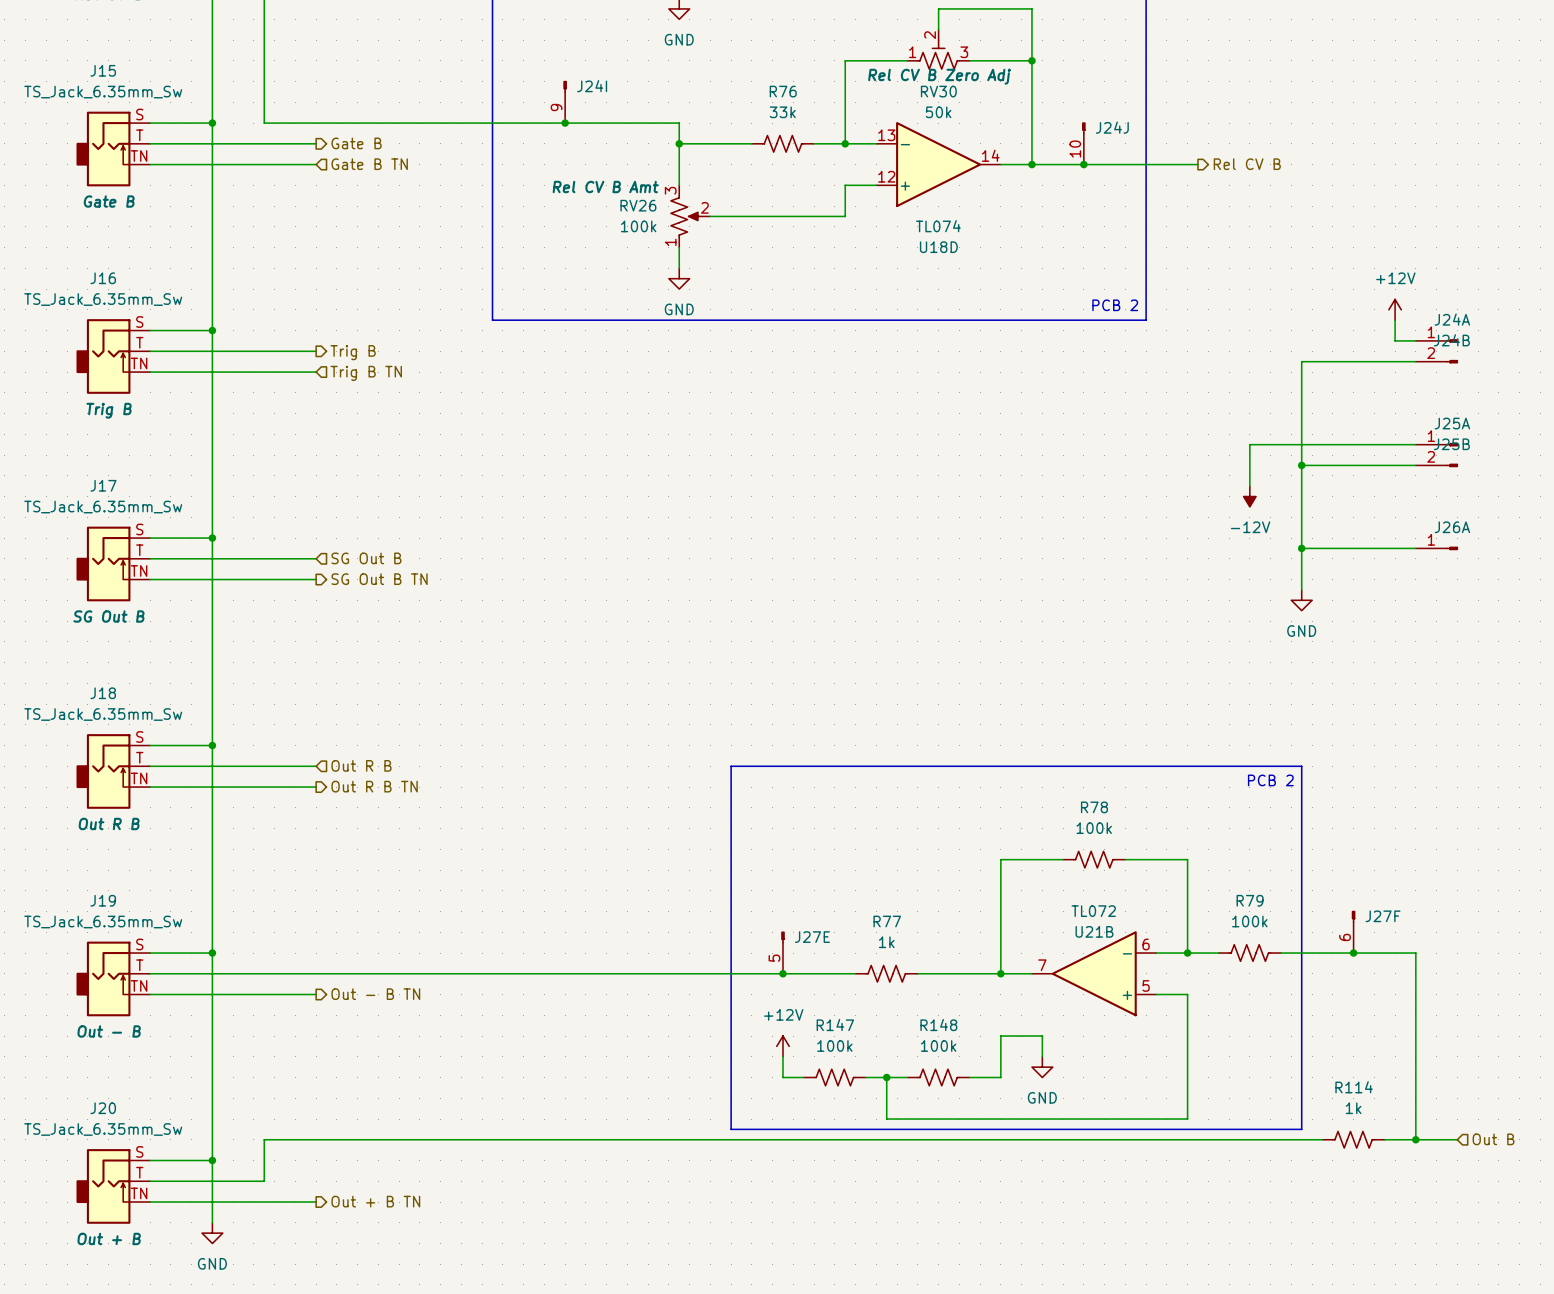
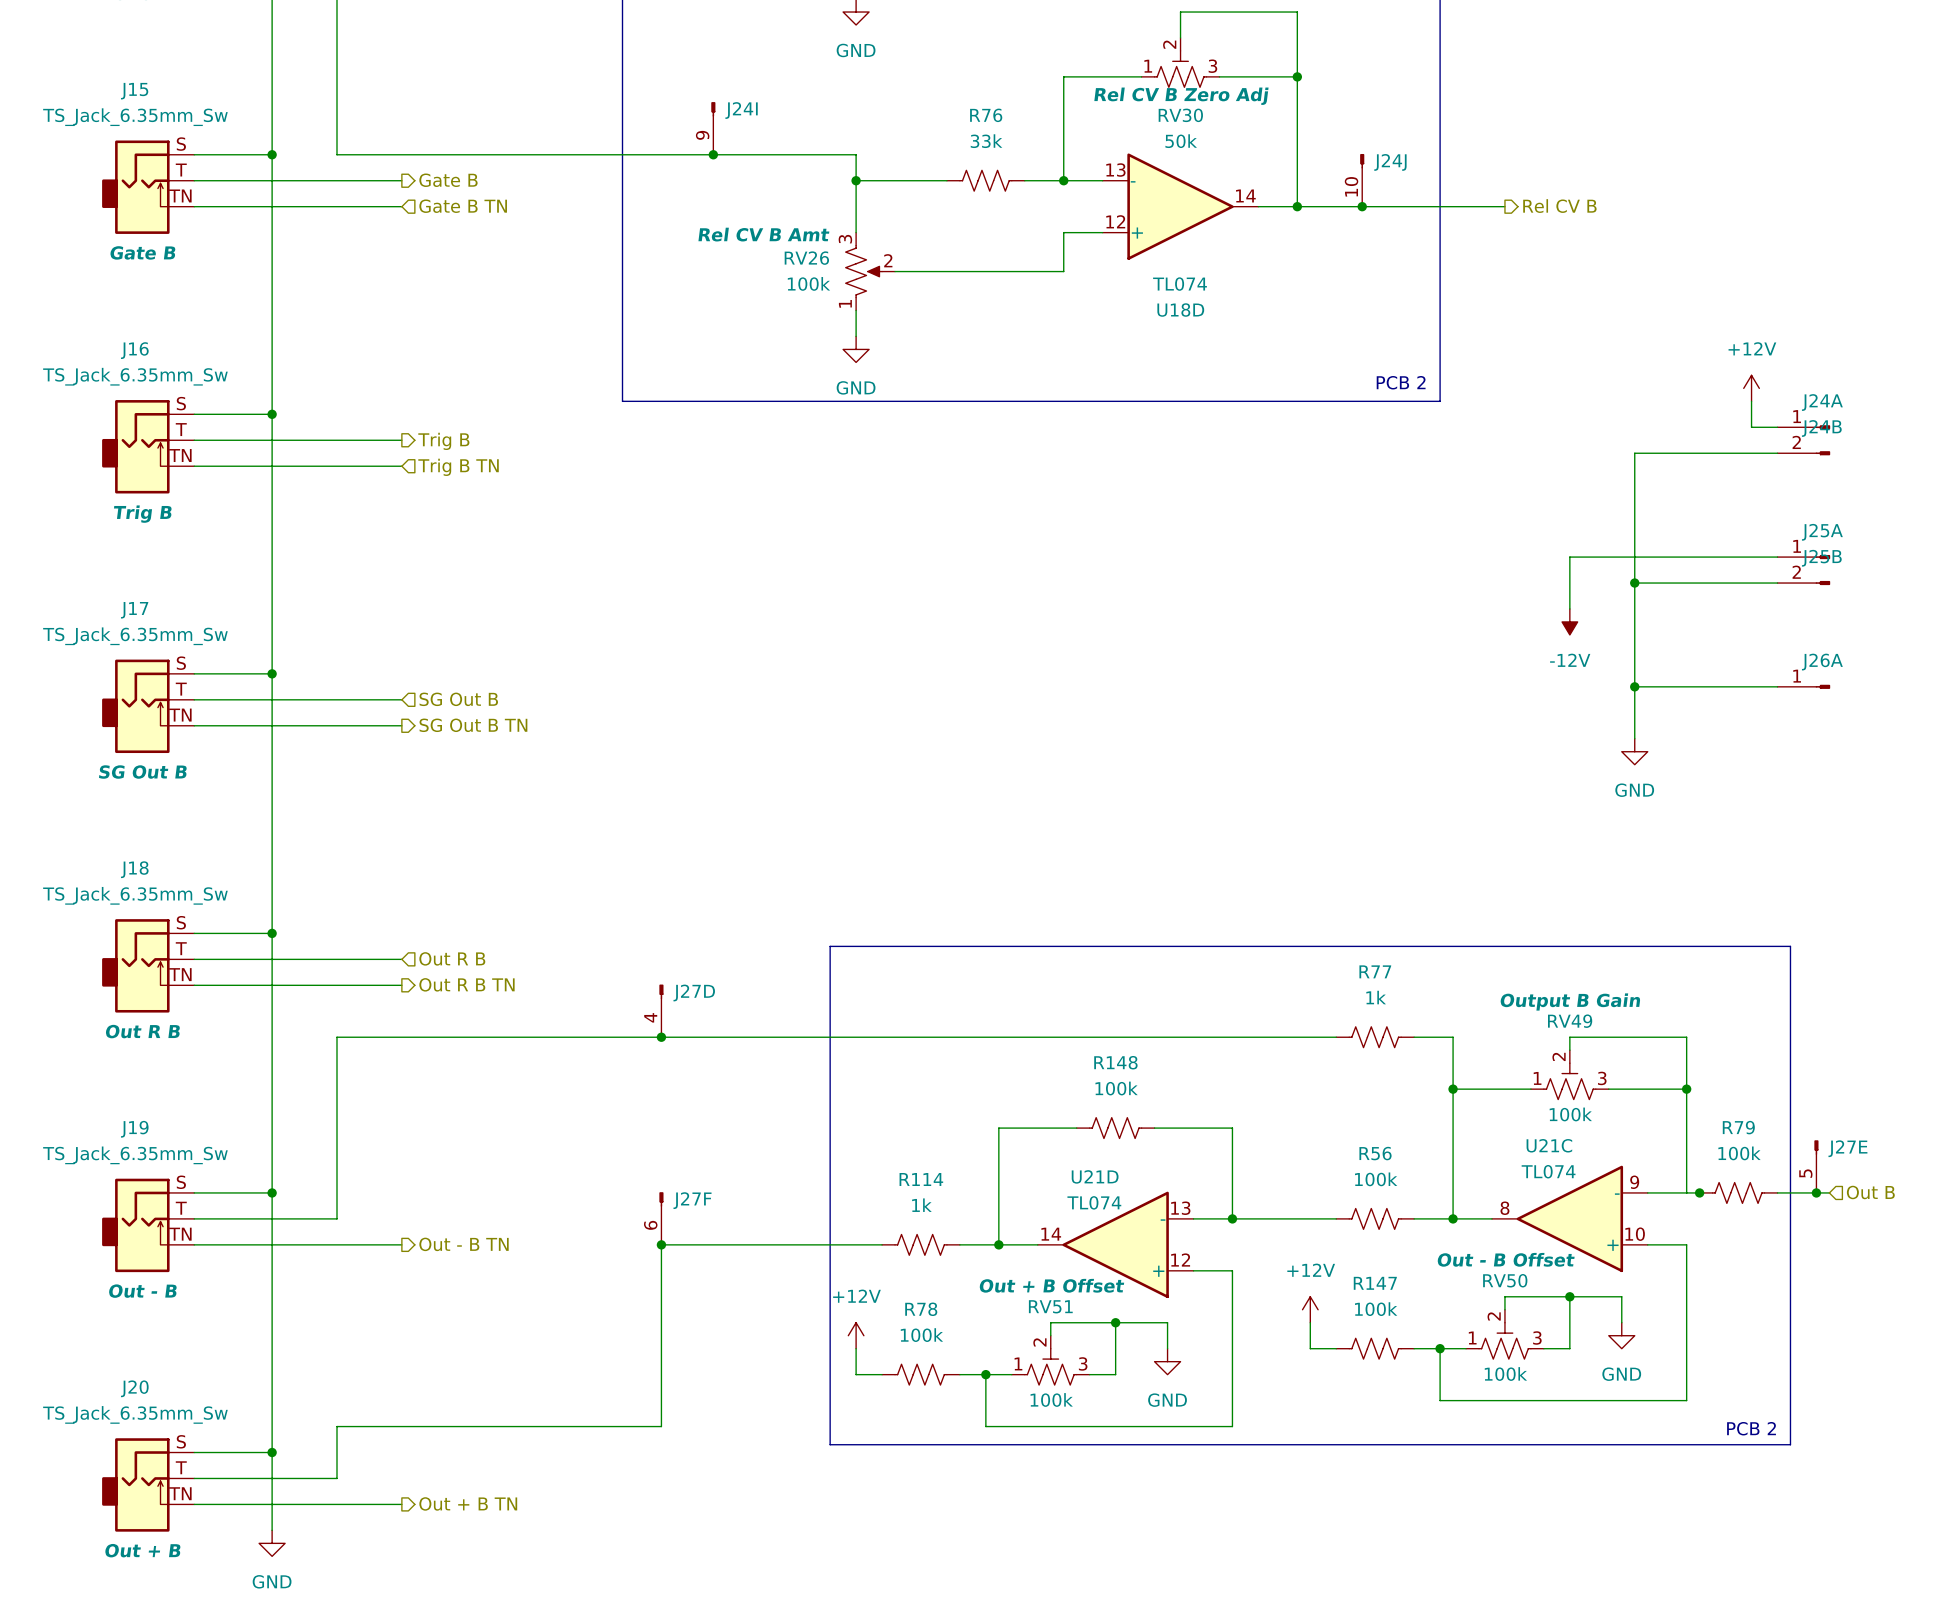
line: (731, 766) (1301, 766) (1301, 1129) (731, 1129) (731, 766) -> (830, 946) (830, 1444) (1790, 1444) (1790, 946) (830, 946)
text: PCB 2 (1270, 780) -> none
J27D: none -> (661, 1010)
junction: none -> (661, 1037)
wire: none -> (1414, 1037) (1453, 1037) (1453, 1218)
wire: none -> (1569, 1050) (1569, 1037) (1686, 1037) (1686, 1192)
RV49: none -> 100k (1569, 1074)
wire: (1063, 859) (1000, 859) (1000, 973) -> none
R78 position: (1094, 859) -> (920, 1374)
wire: (1125, 859) (1187, 859) (1187, 953) -> none
wire: none -> (1453, 1089) (1530, 1089)
junction: none -> (1453, 1089)
wire: none -> (1608, 1089) (1686, 1089)
junction: none -> (1686, 1089)
wire: none -> (1076, 1128) (998, 1128) (998, 1244)
wire: none -> (1154, 1128) (1232, 1128) (1232, 1218)
J27F position: (1353, 931) -> (661, 1218)
J27E position: (782, 952) -> (1816, 1166)
wire: (1156, 953) (1218, 953) -> (1414, 1218) (1491, 1218)
junction position: (1187, 953) -> (1453, 1218)
R79 position: (1249, 953) -> (1738, 1192)
wire: (1353, 953) (1415, 953) (1415, 1139) -> none
wire: none -> (1777, 1192) (1829, 1192)
junction: none -> (1816, 1192)
wire: (264, 973) (855, 973) -> (336, 1218) (336, 1037) (1336, 1037)
junction position: (782, 973) -> (998, 1244)
R77 position: (886, 973) -> (1375, 1037)
junction position: (1000, 973) -> (1232, 1218)
U21B: TL072 (1094, 973) -> none
R56: none -> 100k (1375, 1218)
U21C: none -> TL074 (1569, 1218)
junction: none -> (661, 1244)
wire: none -> (959, 1244) (1037, 1244)
U21D: none -> TL074 (1115, 1244)
wire: (1156, 994) (1187, 994) (1187, 1119) -> (1647, 1244) (1686, 1244) (1686, 1400) (1491, 1400)
wire: none -> (1569, 1296) (1569, 1348) (1543, 1348)
junction: none -> (1569, 1296)
power symbol position: +12V (782, 1046) -> +12V (856, 1335)
power symbol: none -> +12V (1310, 1309)
wire: none -> (1504, 1309) (1504, 1296) (1621, 1296) (1621, 1322)
wire: (782, 1056) (782, 1077) (803, 1077) -> (856, 1348) (856, 1374) (882, 1374)
wire: none -> (1115, 1322) (1115, 1348)
wire: (1042, 1056) (1042, 1036) (1000, 1036) (1000, 1077) (969, 1077) -> (1310, 1322) (1310, 1348) (1336, 1348)
RV50: none -> 100k (1504, 1334)
wire: none -> (1050, 1335) (1050, 1322) (1167, 1322) (1167, 1348)
power symbol position: GND (1042, 1067) -> GND (1167, 1361)
power symbol: none -> GND (1621, 1335)
R147 position: (834, 1077) -> (1375, 1348)
wire: (865, 1077) (907, 1077) -> (959, 1374) (1011, 1374)
junction position: (886, 1077) -> (1115, 1322)
R148 position: (938, 1077) -> (1115, 1128)
wire: none -> (1414, 1348) (1466, 1348)
junction: none -> (1440, 1348)
RV51: none -> 100k (1050, 1360)
wire: none -> (985, 1374) (985, 1426)
junction: none -> (985, 1374)
wire: none -> (1089, 1374) (1115, 1374)
wire: (886, 1098) (886, 1119) (1146, 1119) -> (1440, 1348) (1440, 1400)
wire: (523, 1139) (782, 1139) -> (661, 1426) (661, 1244) (882, 1244)
wire: (980, 1139) (1322, 1139) -> (1232, 1426) (1232, 1270) (1193, 1270)
R114 position: (1353, 1139) -> (920, 1244)
wire: (1384, 1139) (1457, 1139) -> none
junction: (1415, 1139) -> none
hierarchical label position: Out B (1493, 1139) -> Out B (1870, 1192)
text: none -> PCB 2 (1751, 1428)

